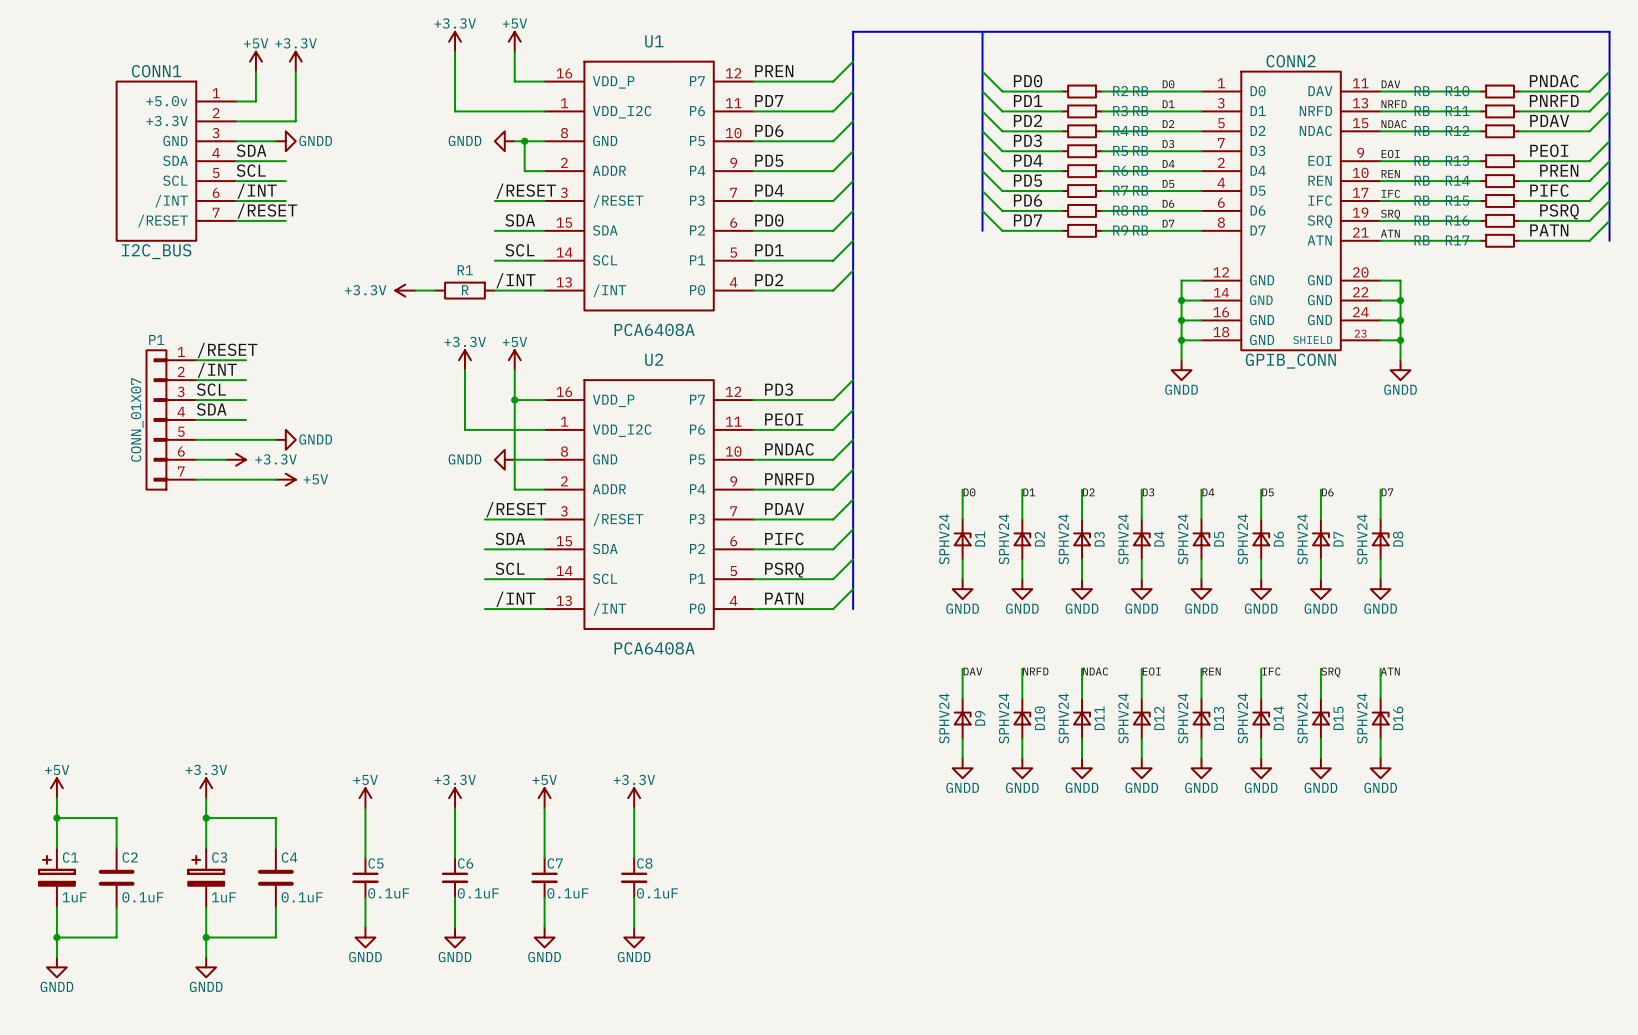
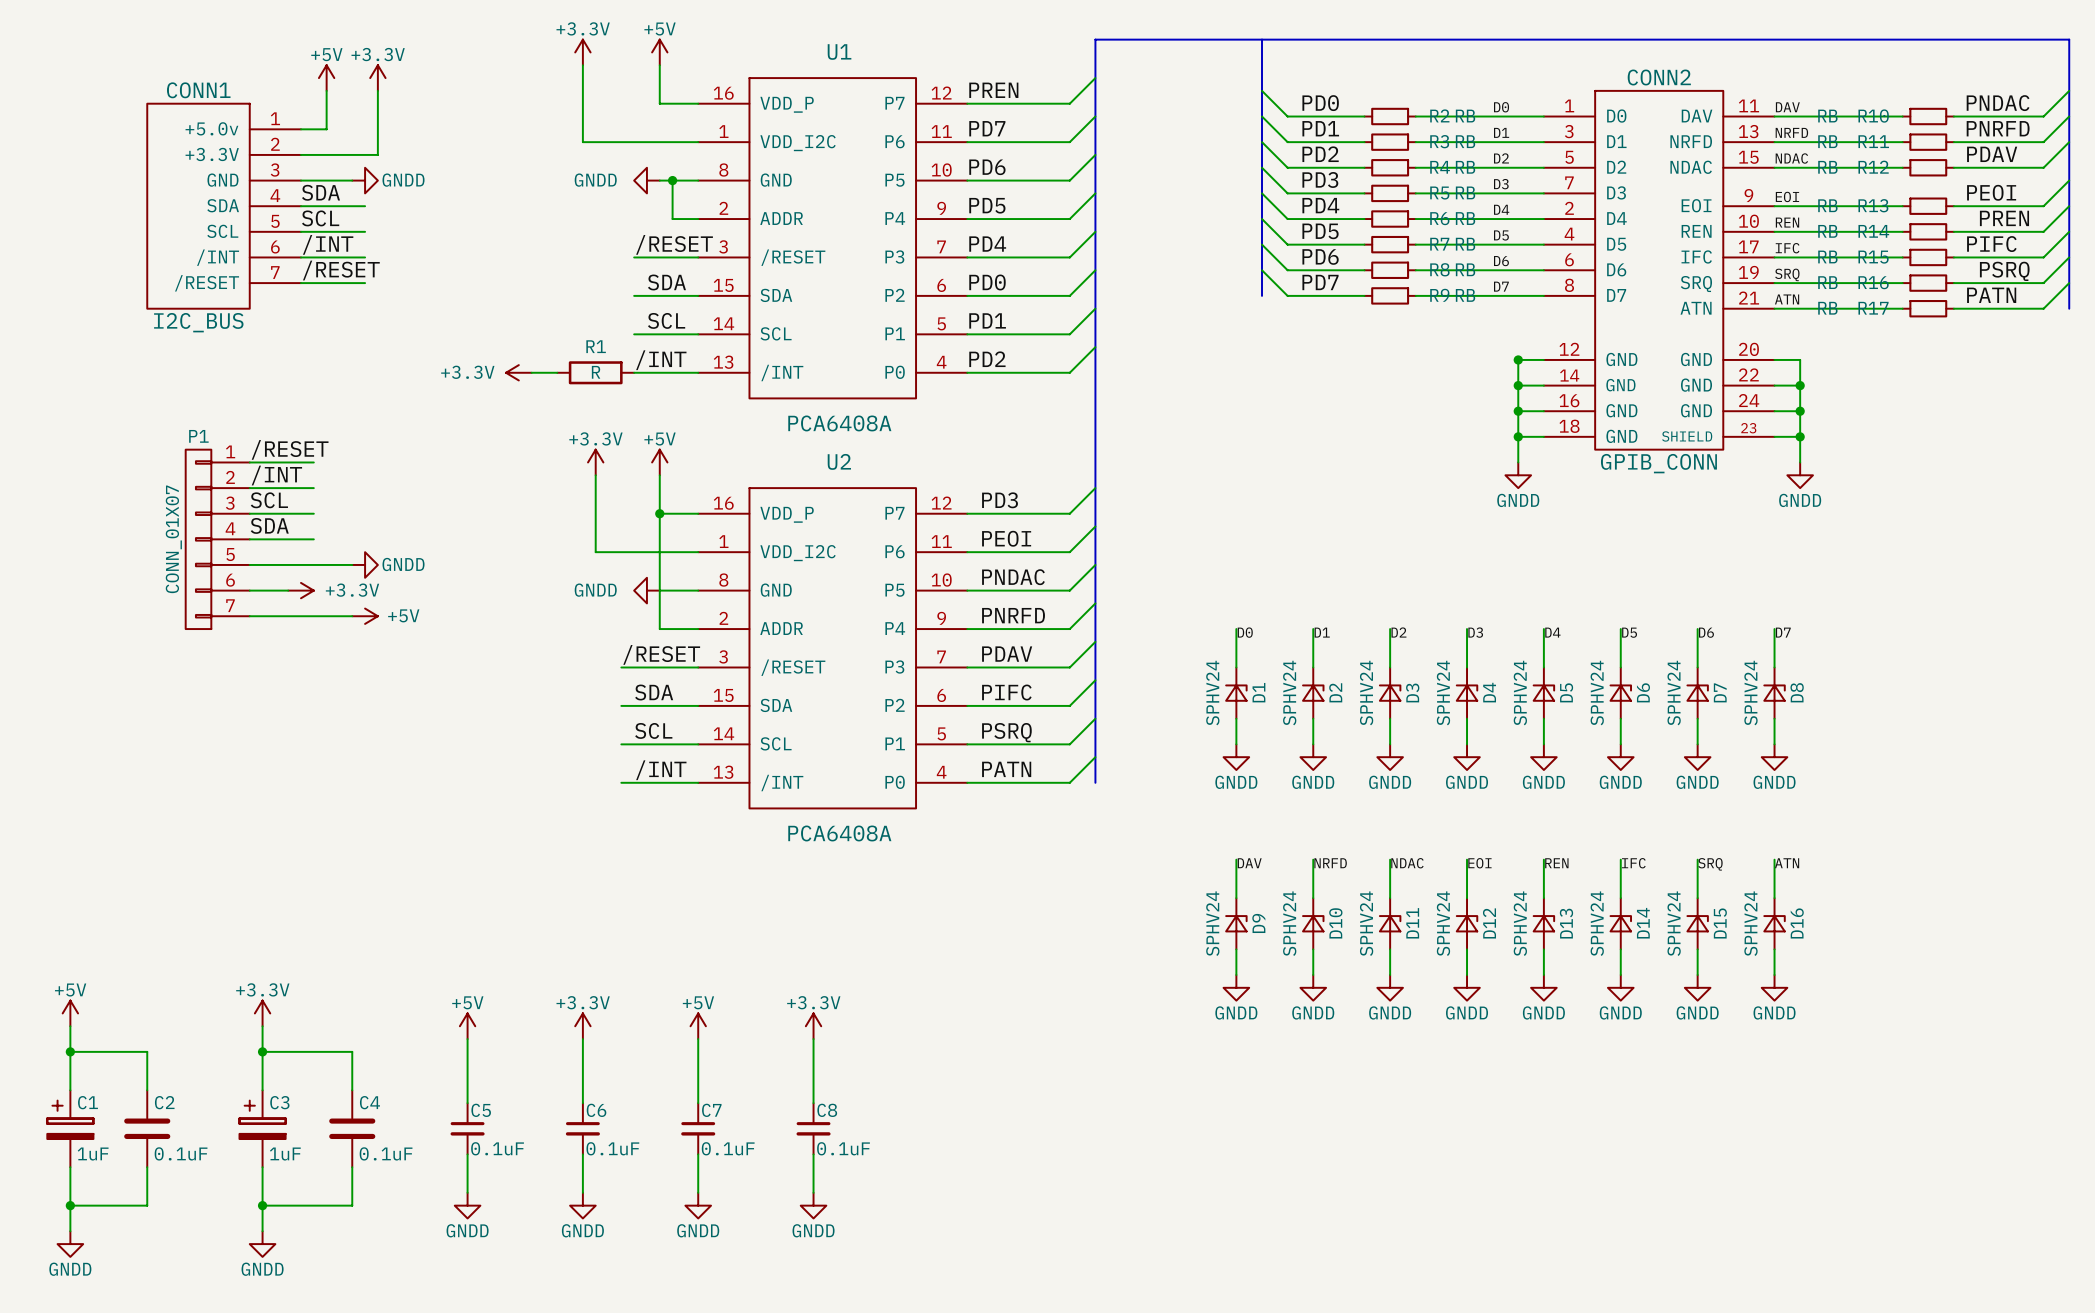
junction: none -> (1518, 359)

